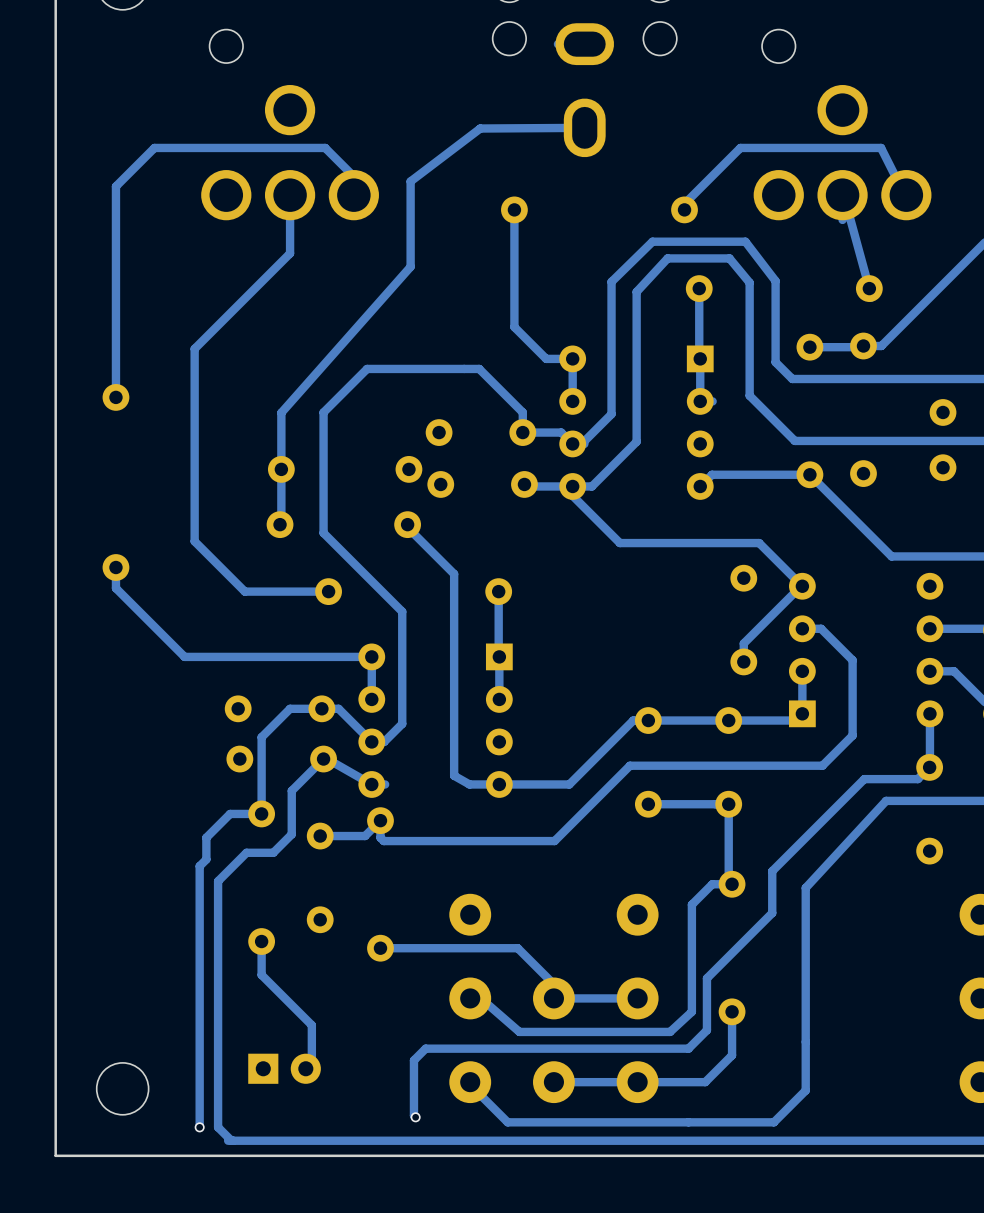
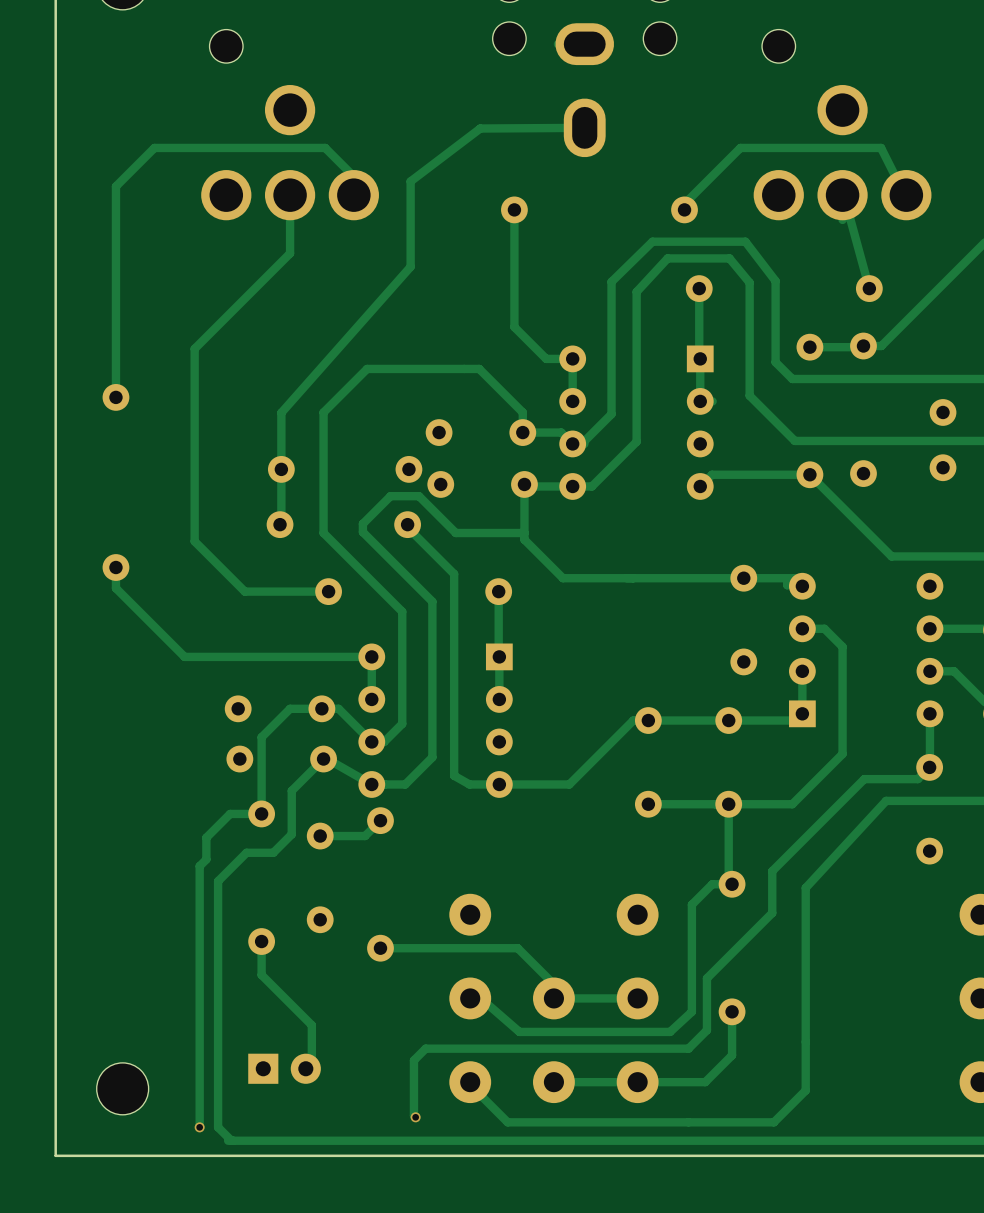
track: none -> (524, 484) (524, 539) (562, 578) (794, 578) (787, 585) (787, 583)
track: (572, 486) (572, 495) (619, 543) (759, 543) (801, 584) -> none
track: none -> (524, 533) (455, 533) (418, 496) (390, 496) (362, 523) (362, 532) (432, 601) (432, 757) (405, 784) (385, 784)
track: (802, 586) (743, 643) (743, 661) -> none
track: (821, 628) (852, 660) (852, 735) (822, 765) (629, 765) (554, 841) (383, 841) (380, 837) (380, 820) -> (821, 628) (824, 628) (842, 646) (842, 754) (792, 804) (728, 804)

